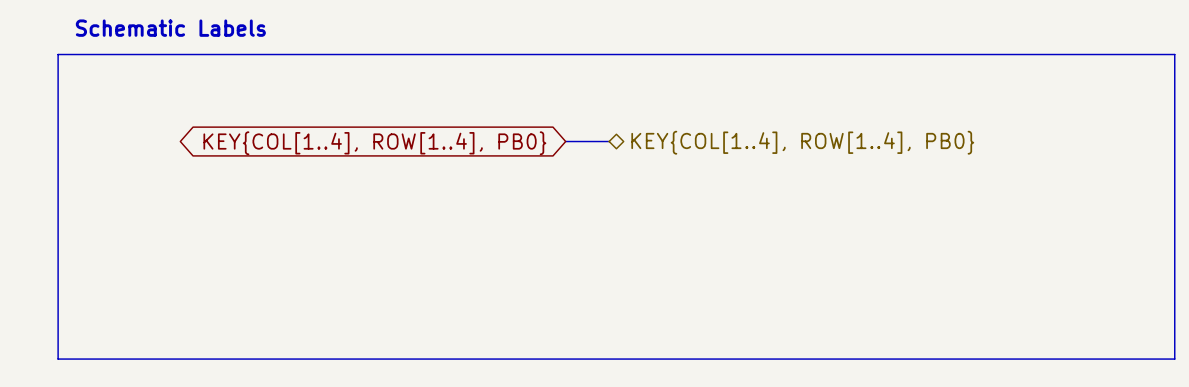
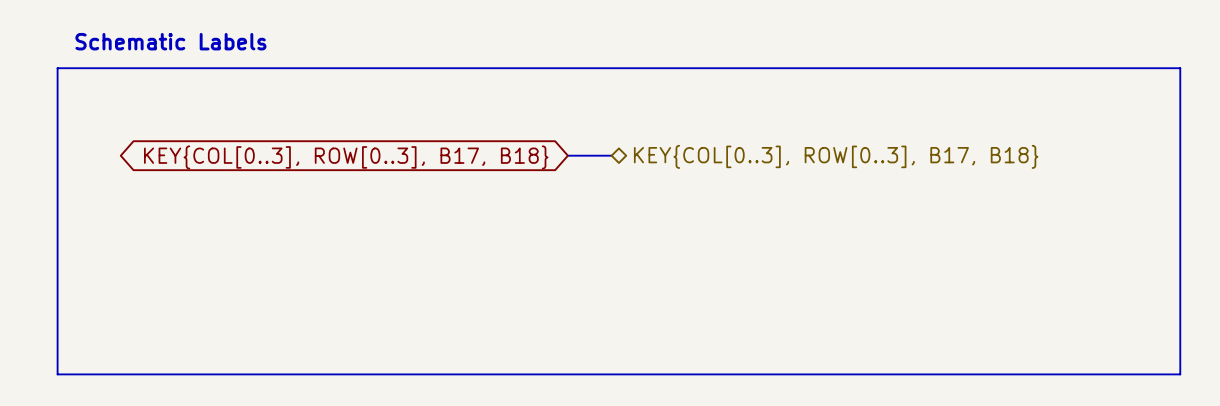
hierarchical label: KEY{COL[1..4], ROW[1..4], PB0} (802, 142) -> KEY{COL[0..3], ROW[0..3], B17, B18} (836, 156)
global label: KEY{COL[1..4], ROW[1..4], PB0} (374, 143) -> KEY{COL[0..3], ROW[0..3], B17, B18} (346, 157)

